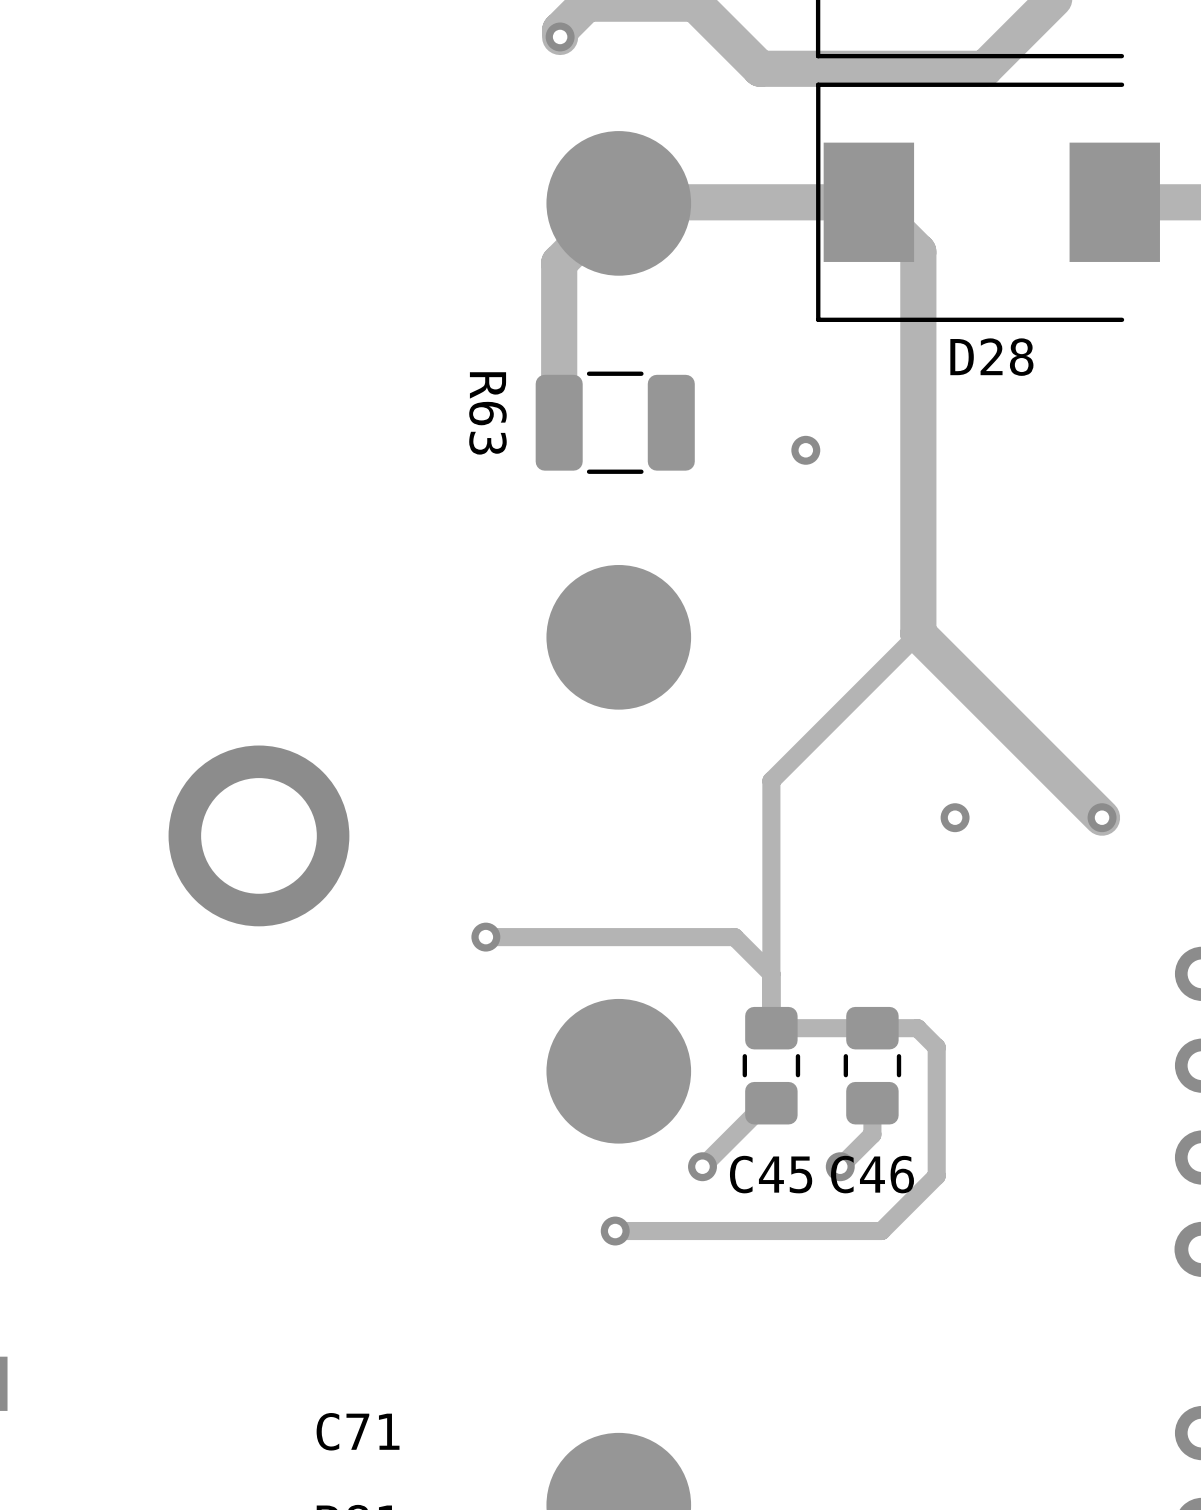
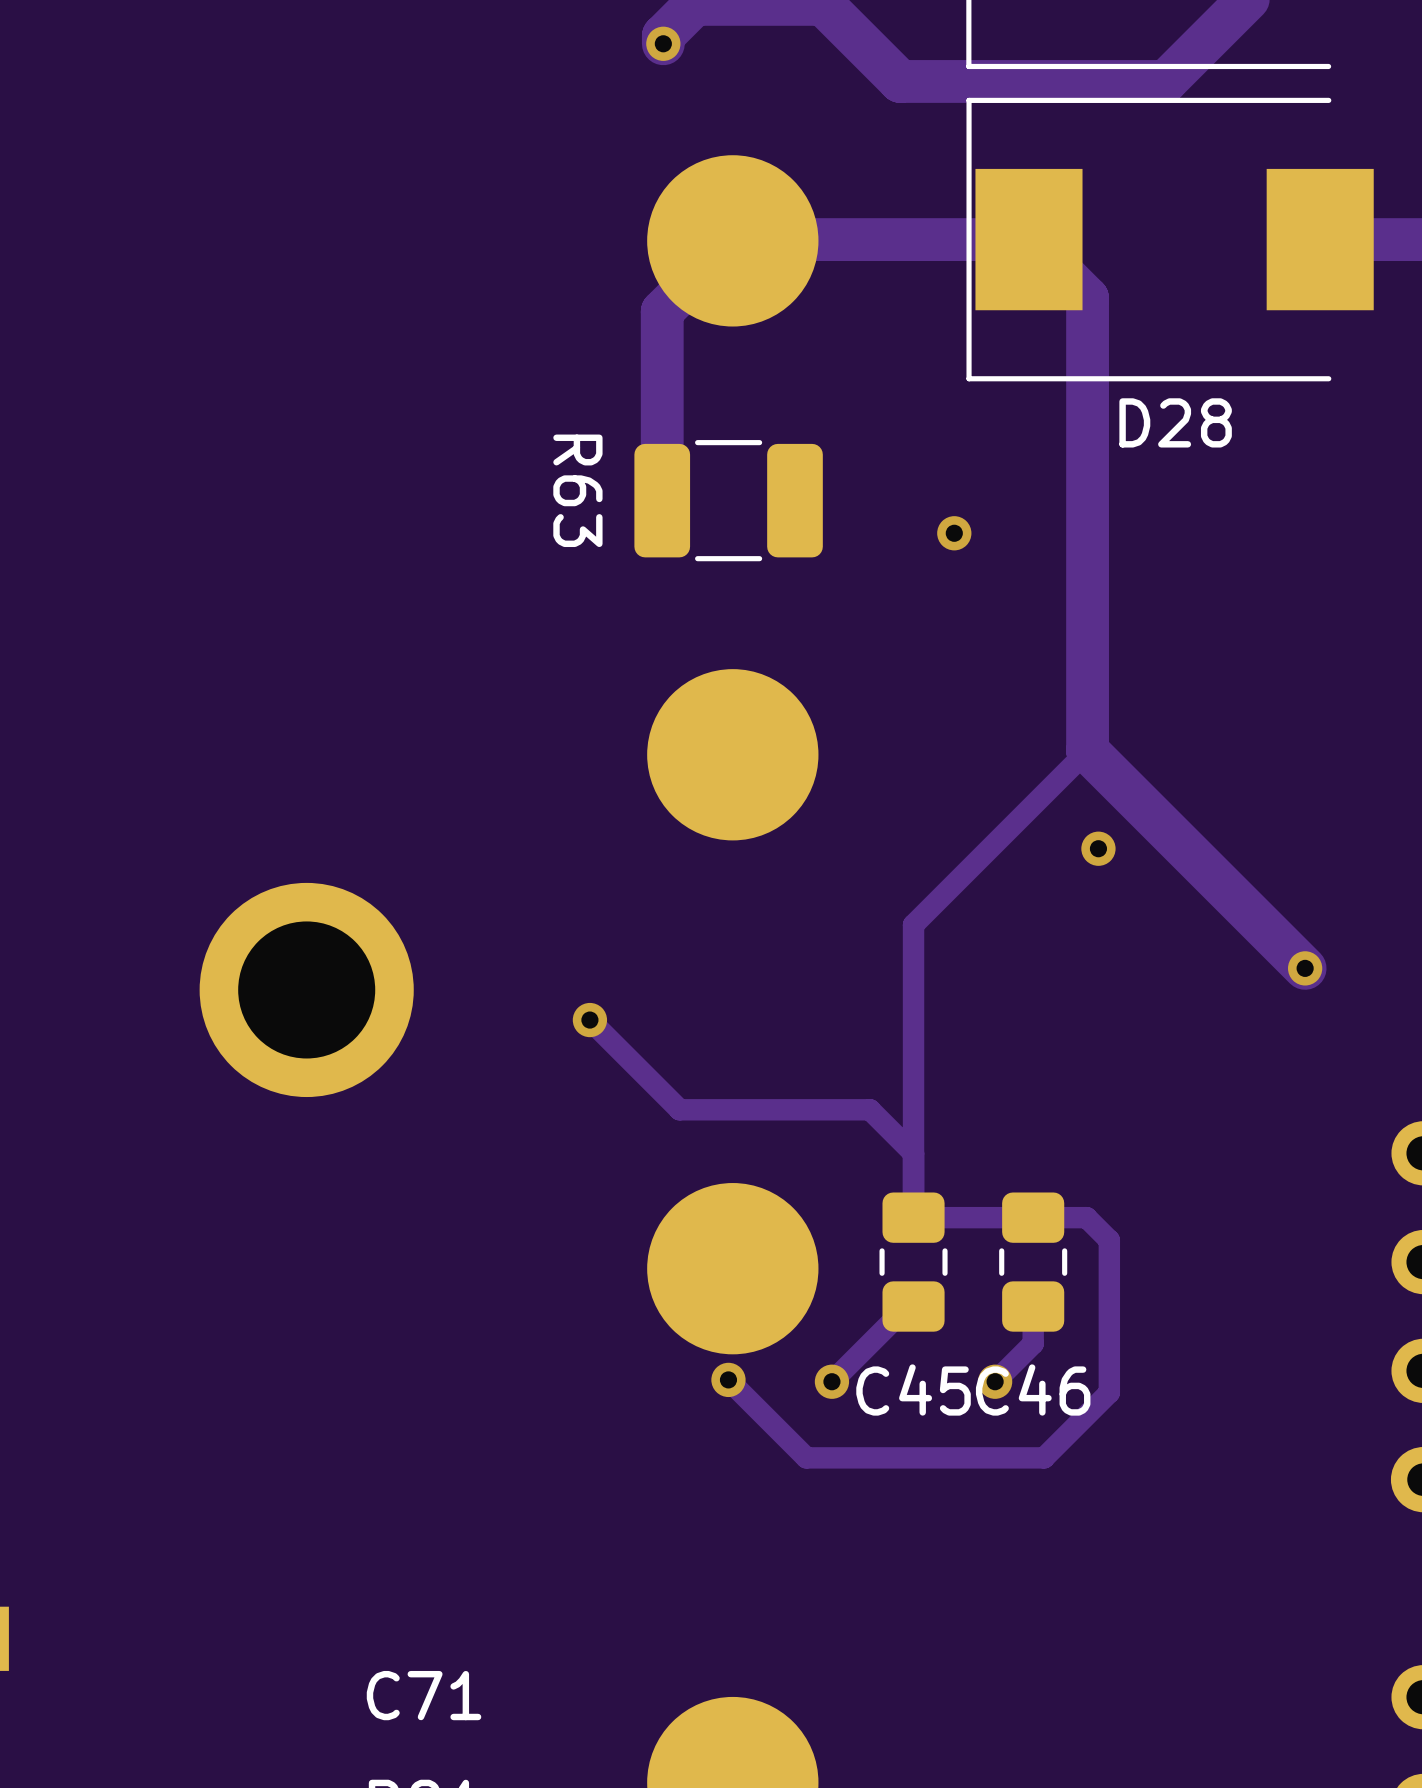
via position: (955, 817) -> (1098, 848)
via position: (485, 937) -> (589, 1020)
track: (573, 937) (485, 937) -> (679, 1109) (589, 1020)
via position: (615, 1231) -> (728, 1379)
track: (680, 1231) (615, 1231) -> (806, 1457) (728, 1379)

